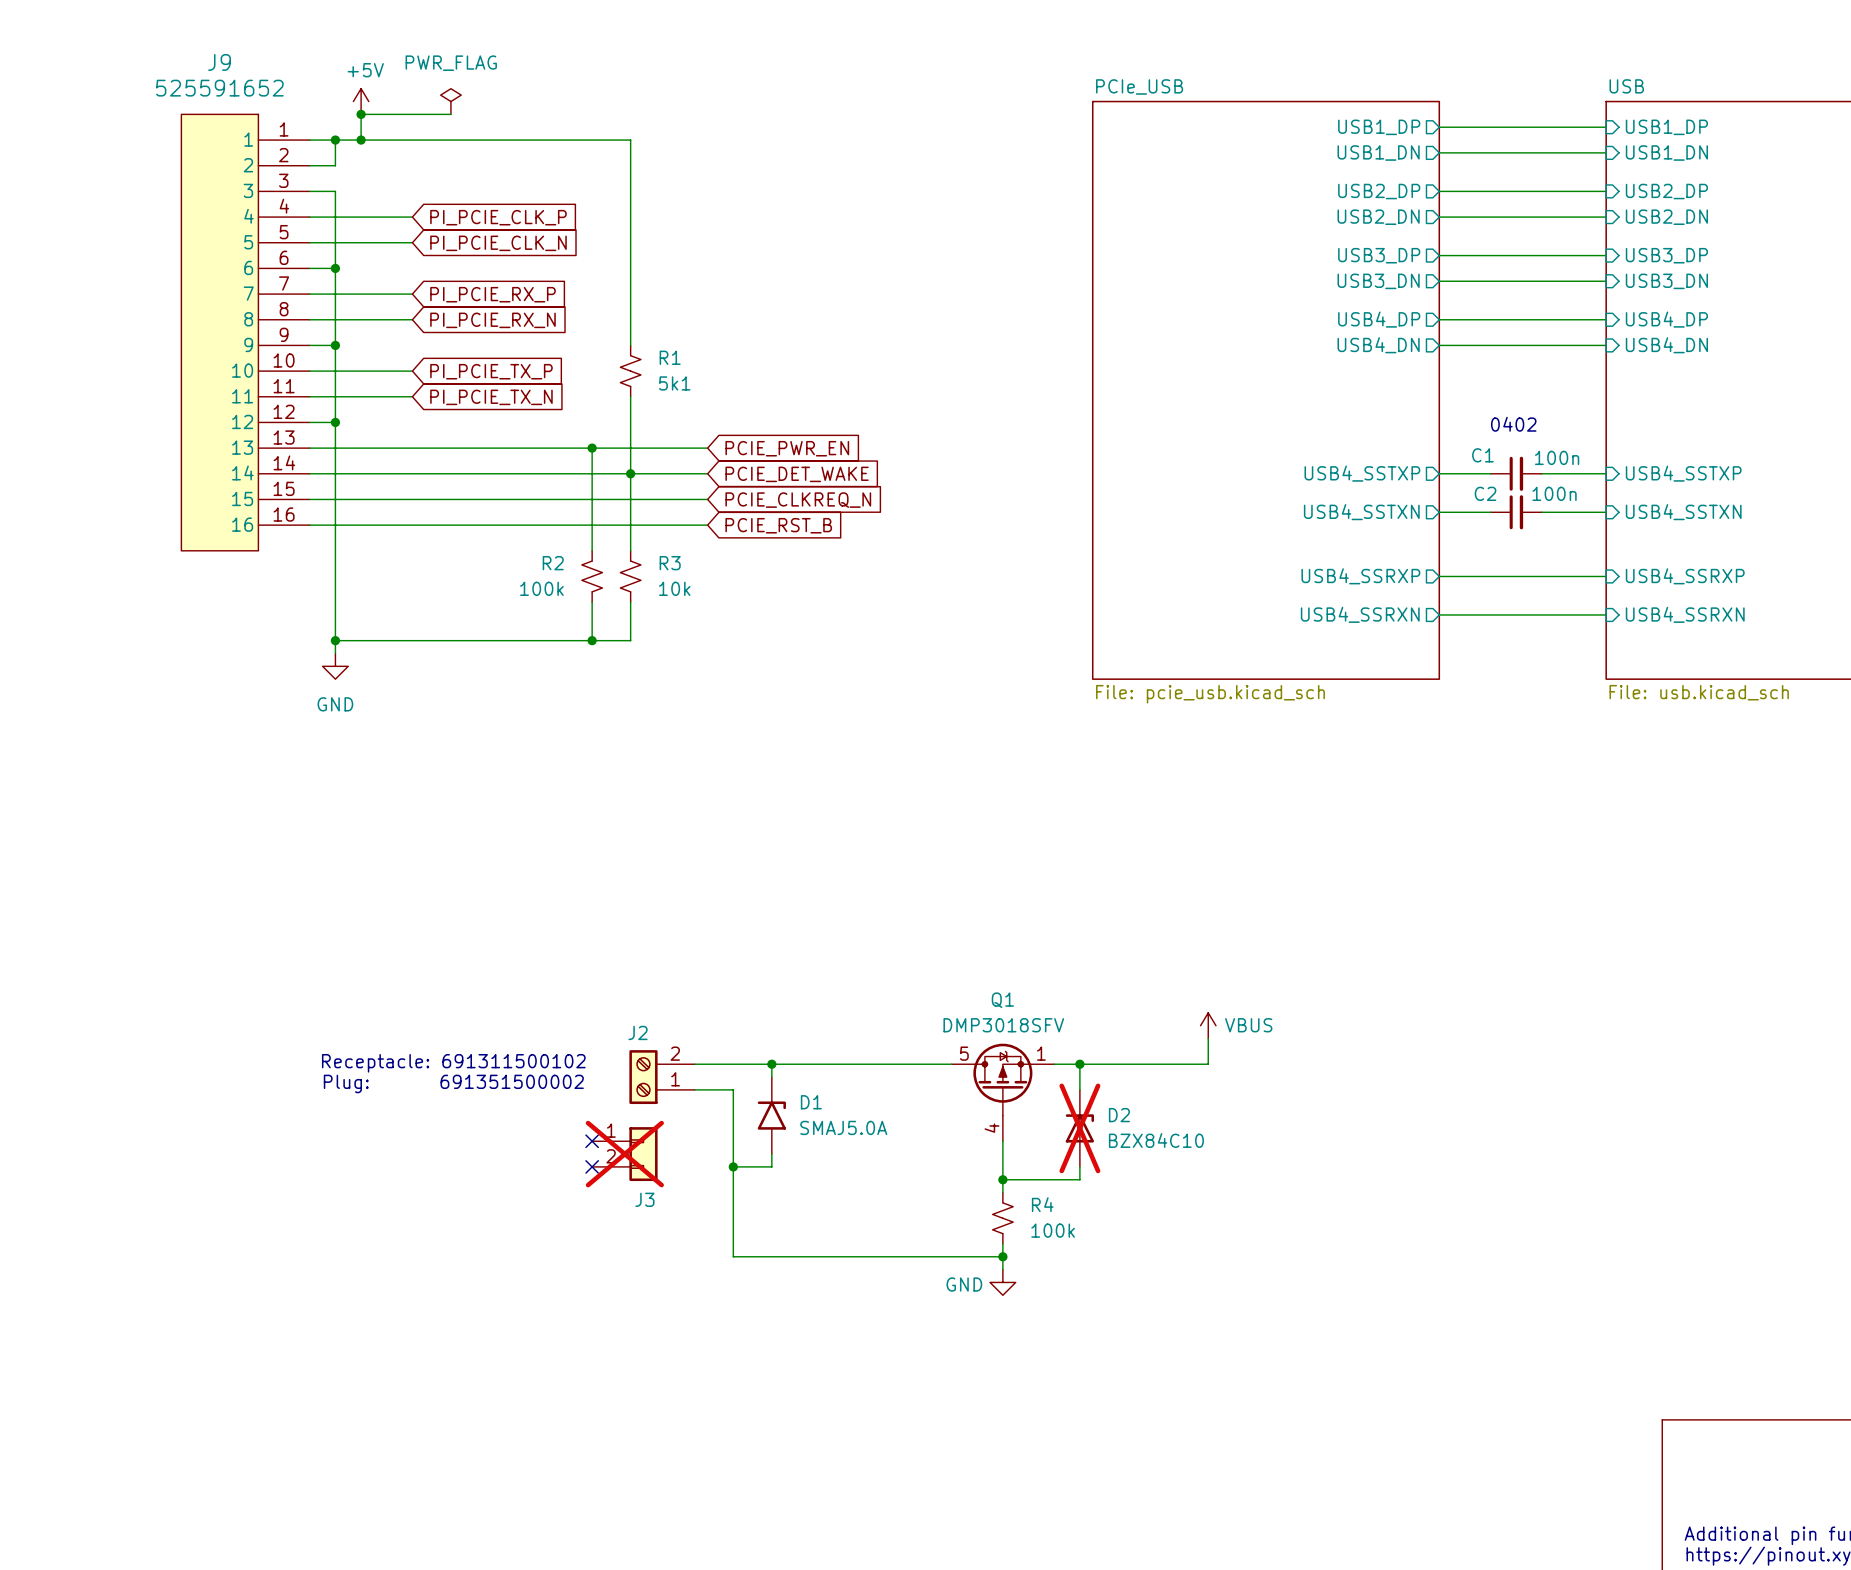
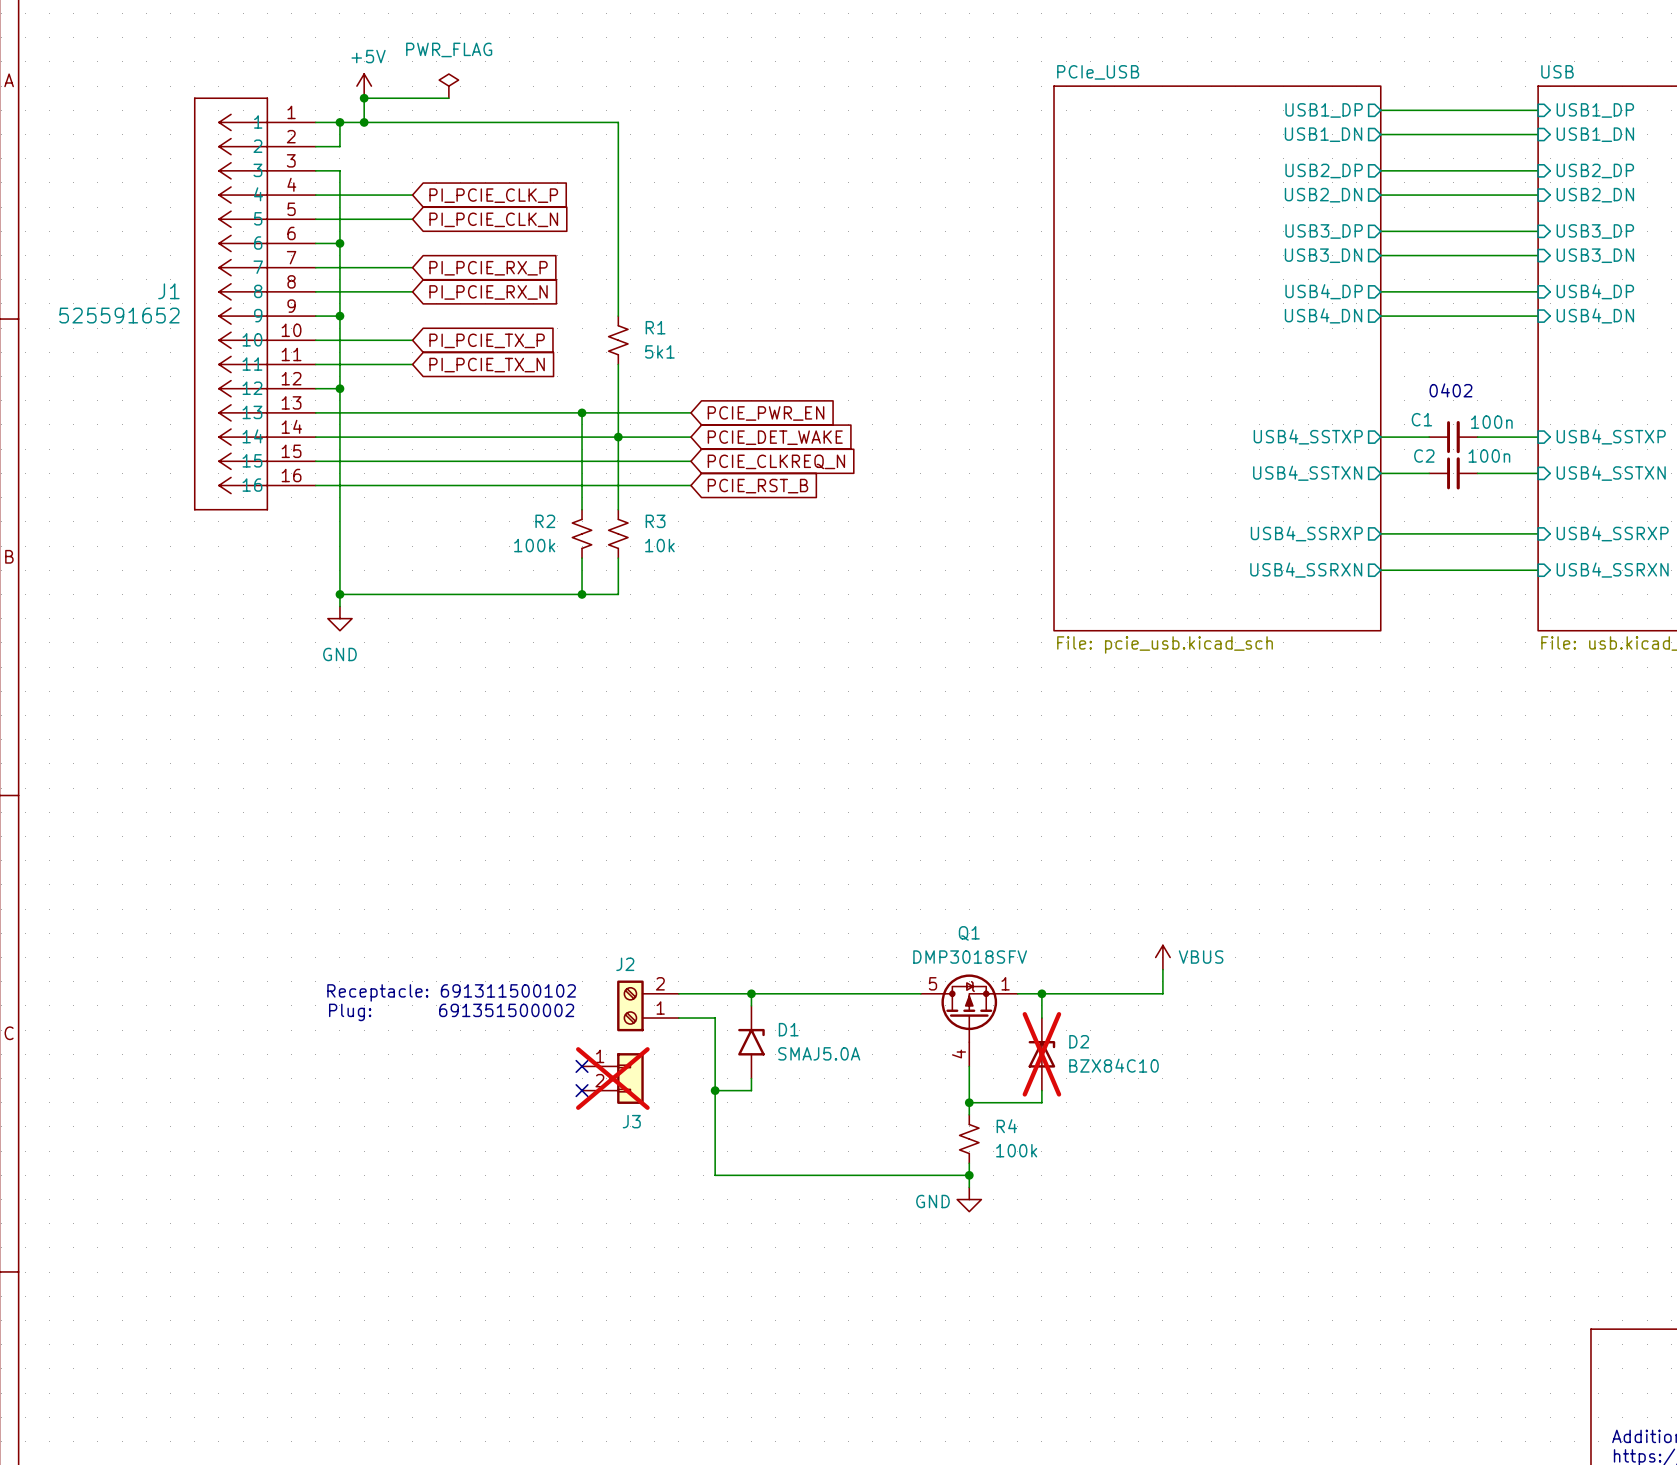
J9: 525591652 (245, 332) -> none
J1: none -> 525591652 (254, 303)

